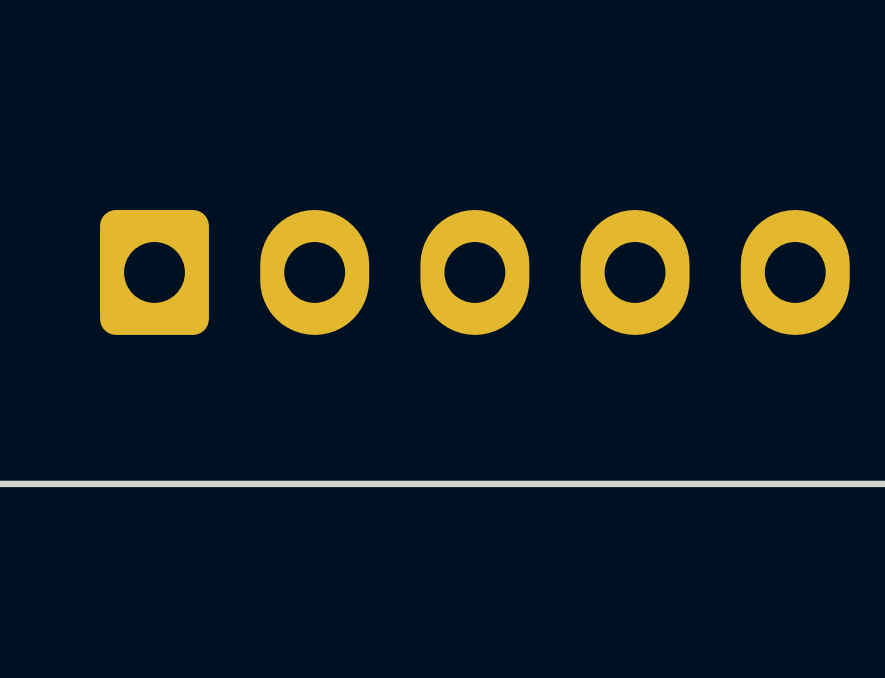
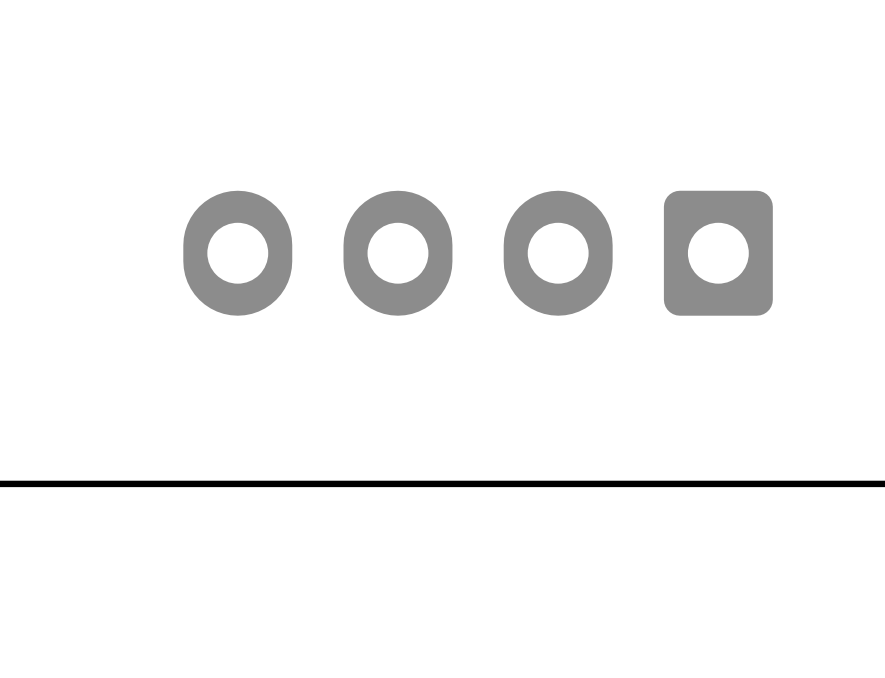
part footprint: [100, 209, 850, 335] -> [183, 190, 773, 316]

